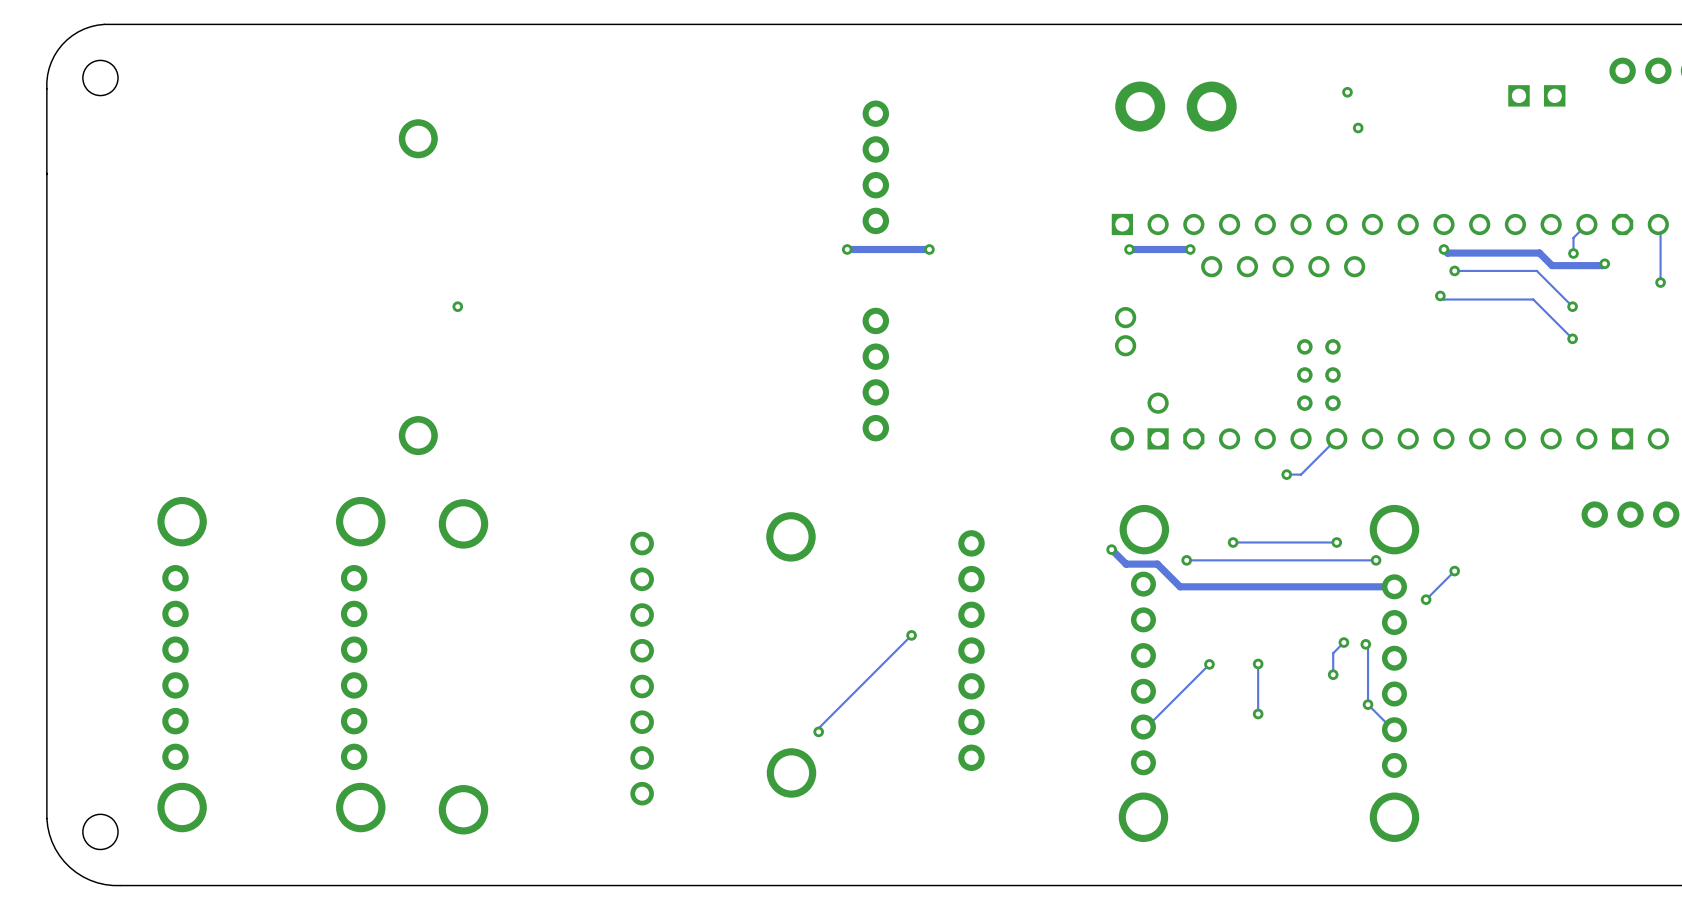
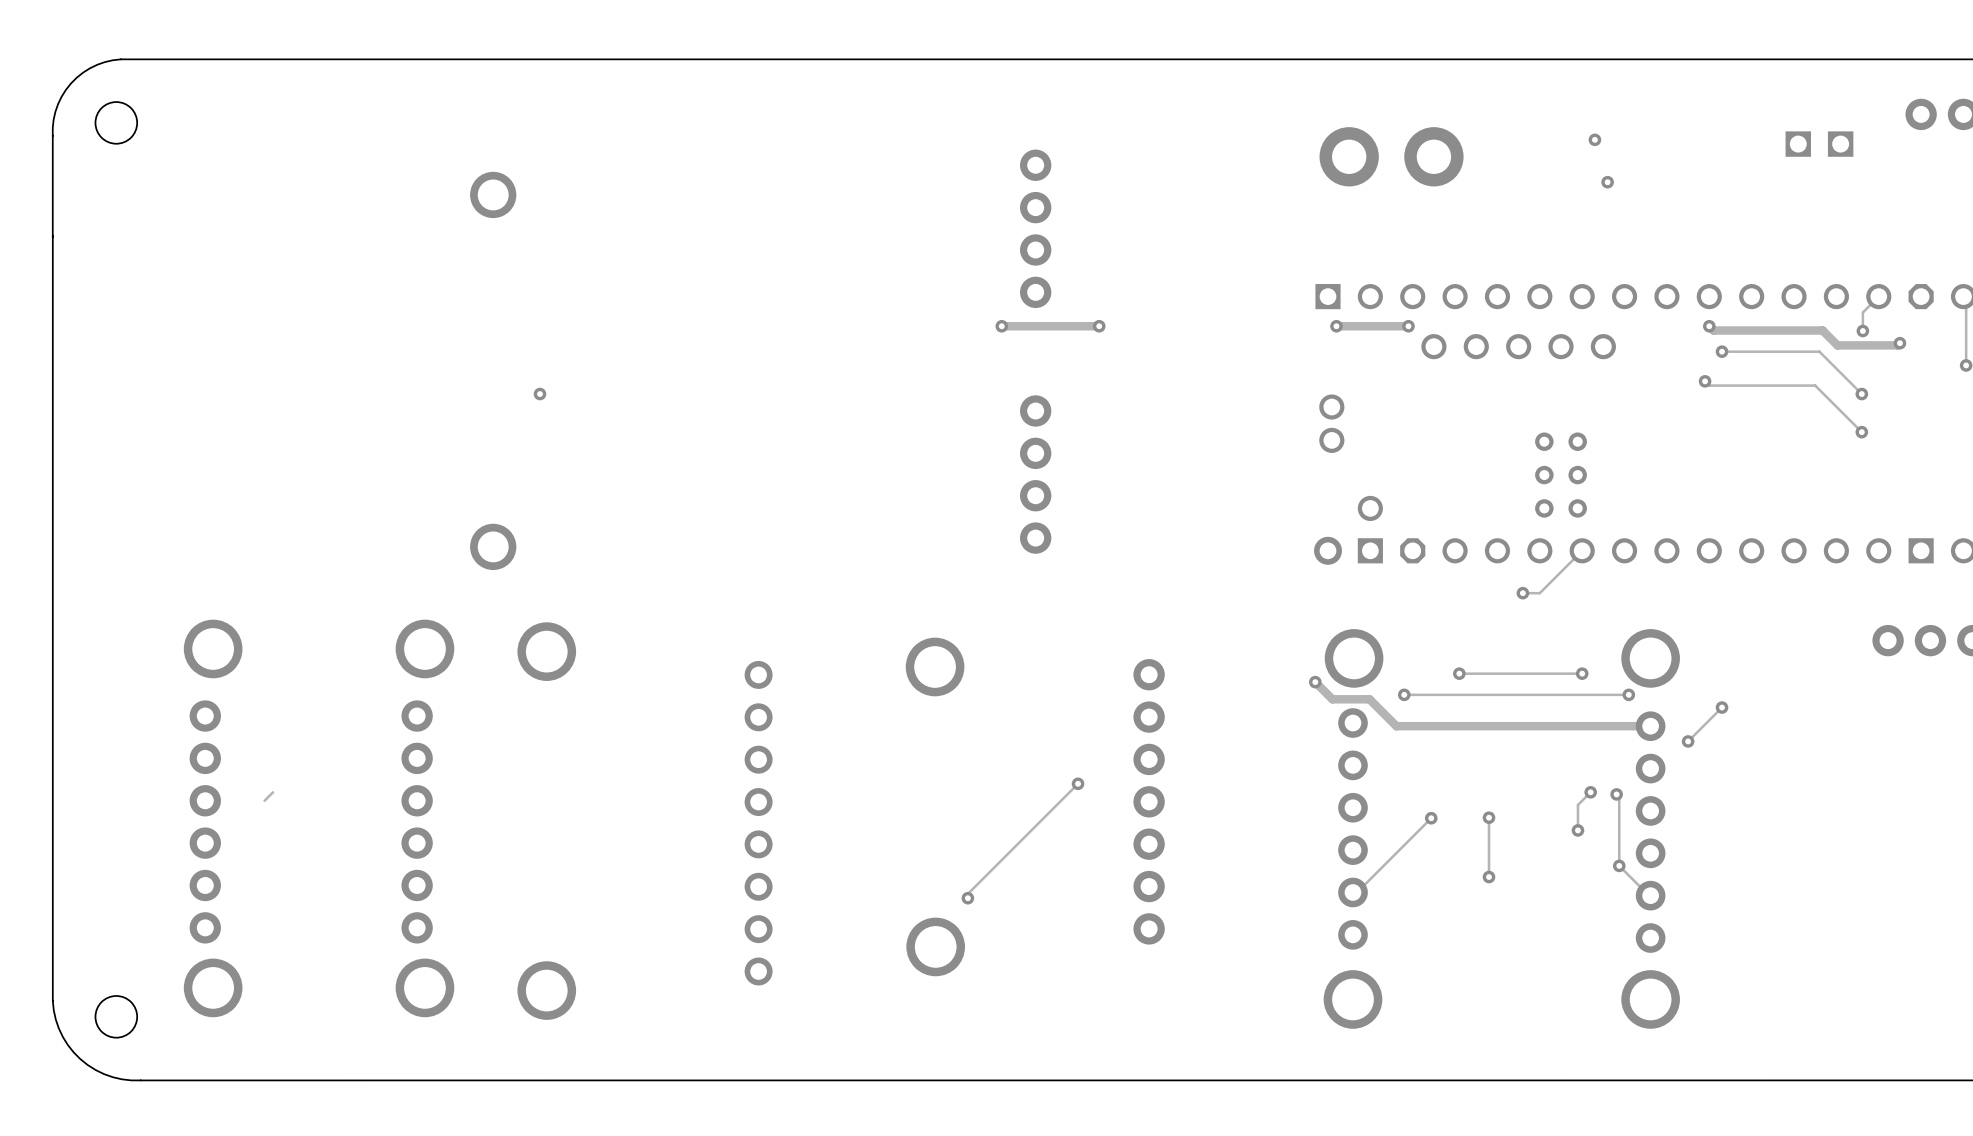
track: none -> (273, 792) (264, 800)

